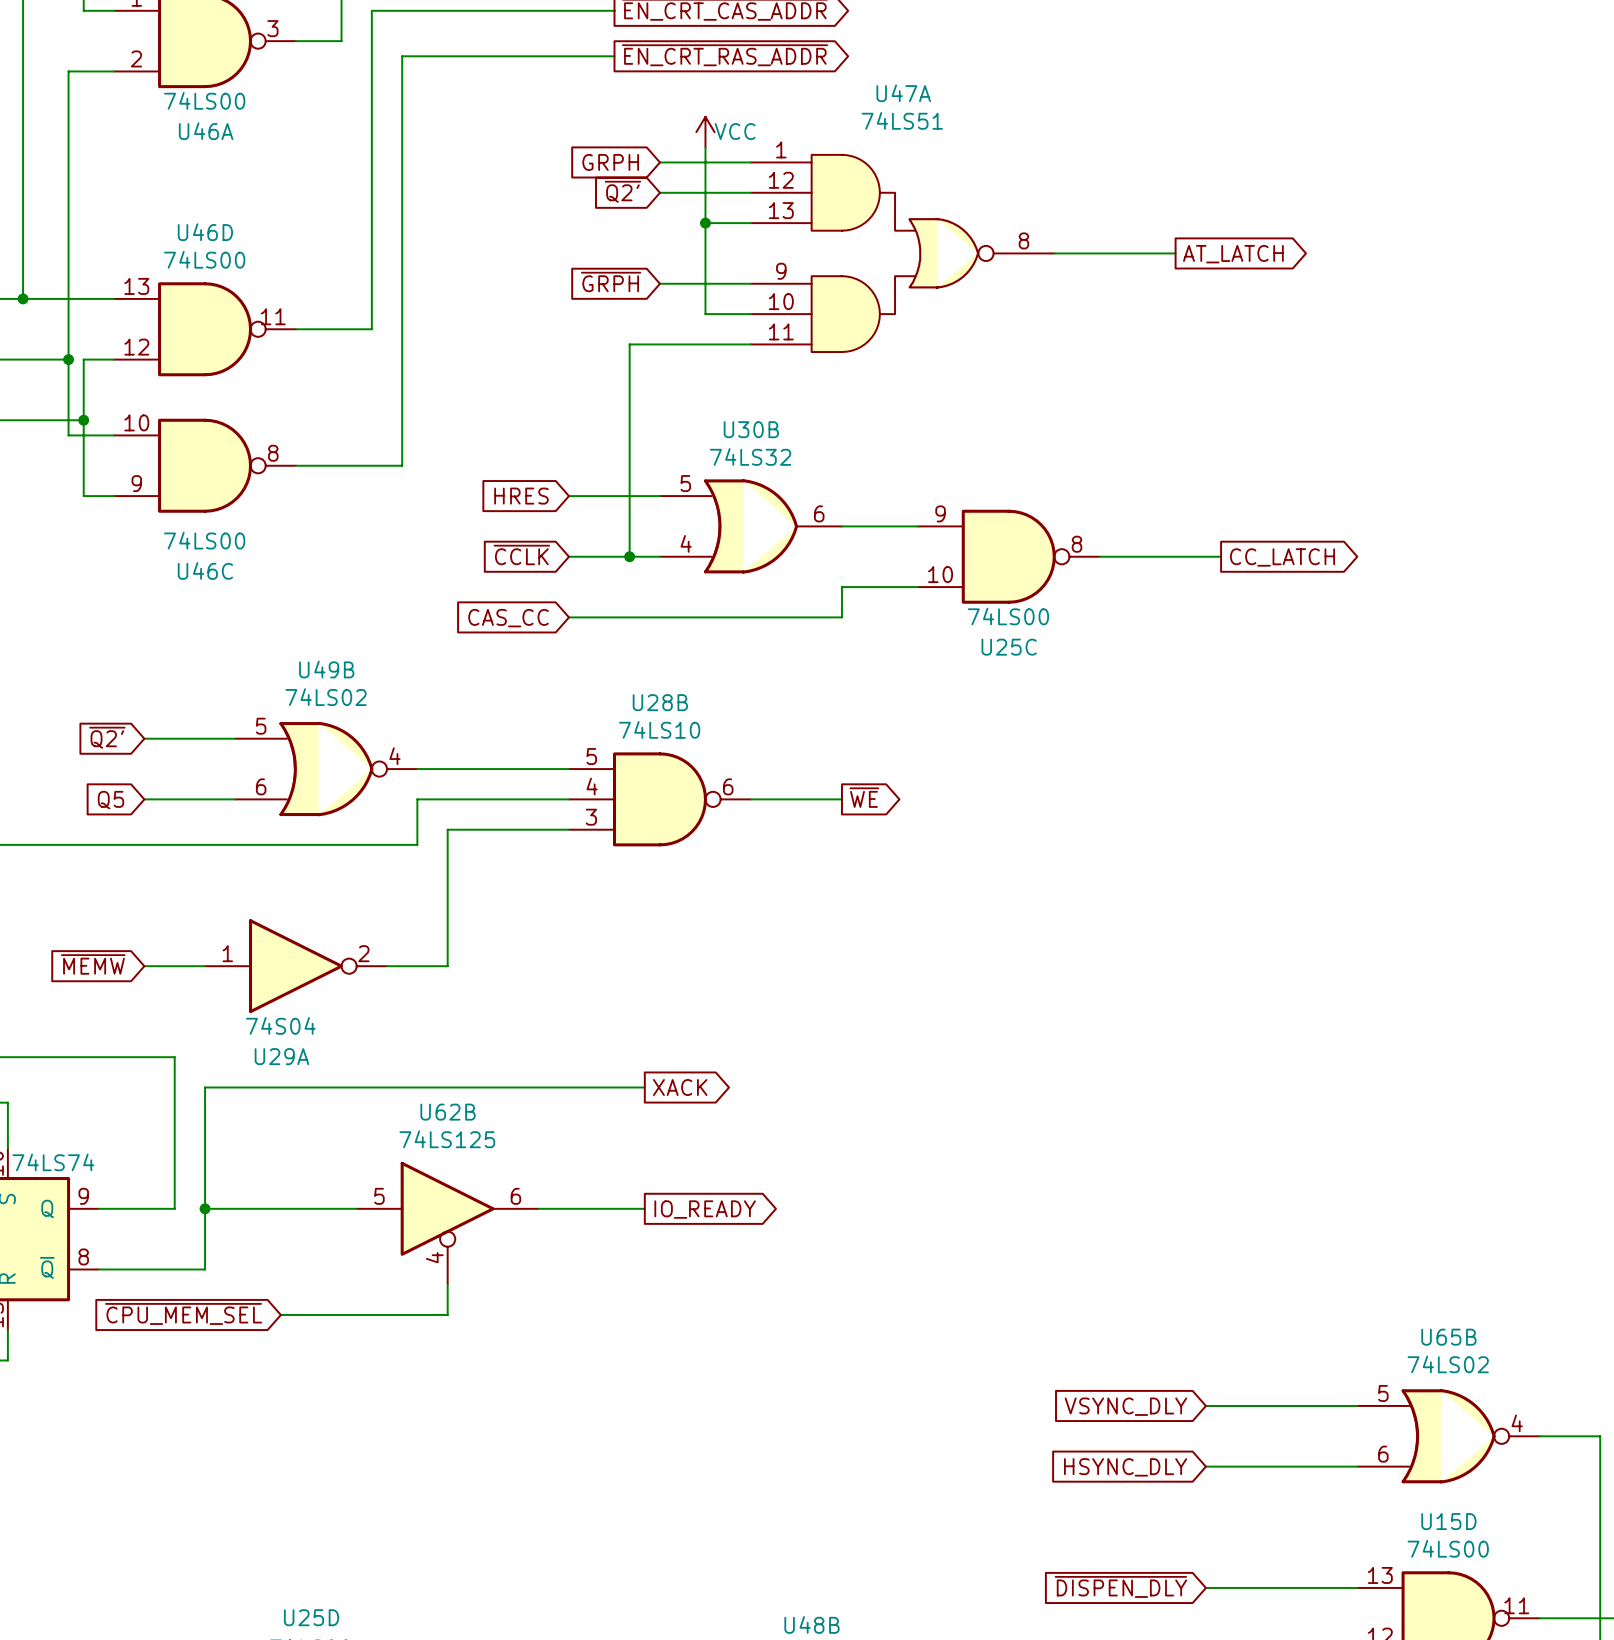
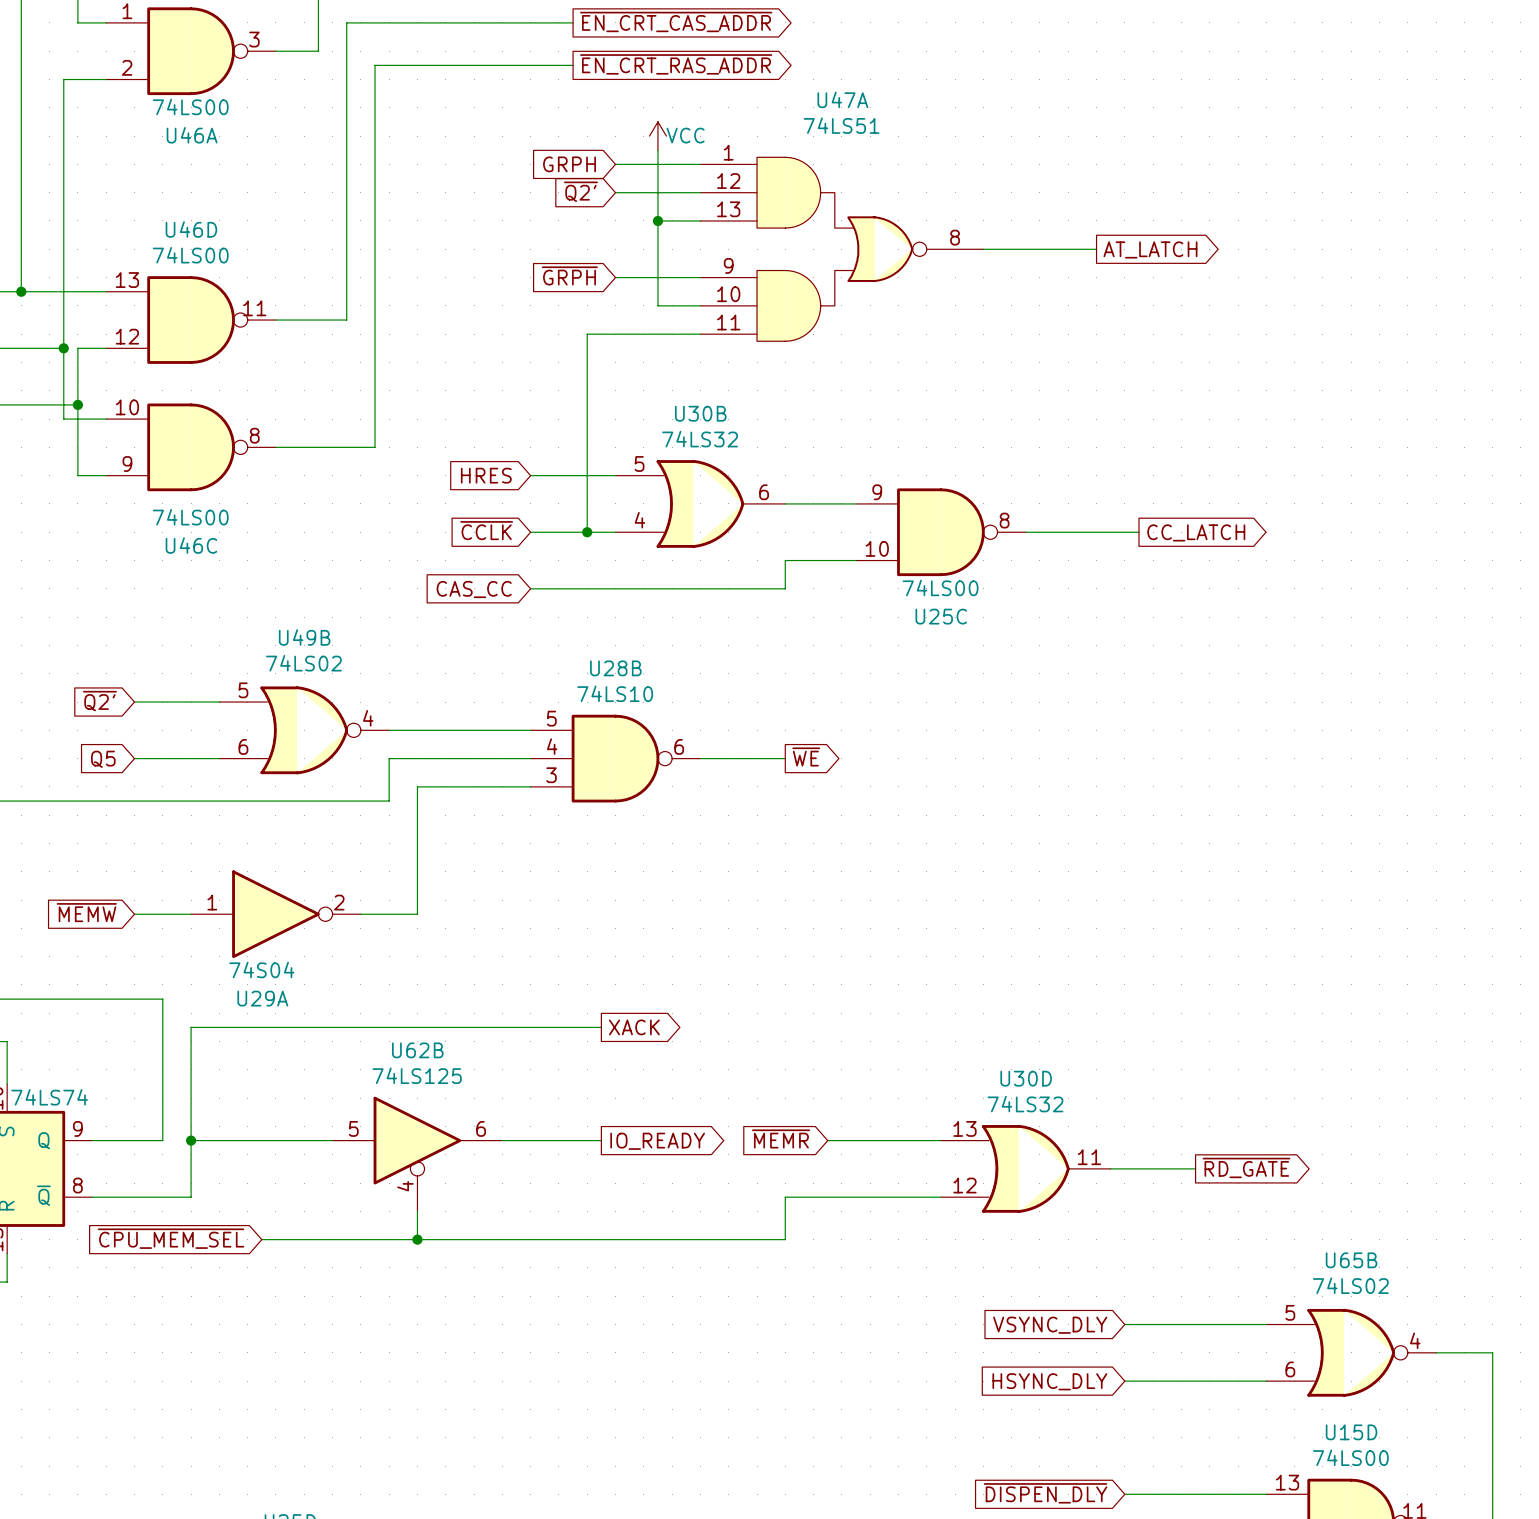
global label: none -> ~{MEMR} (781, 1138)
wire: none -> (827, 1140) (940, 1140)
global label: none -> ~{RD_GATE} (1246, 1167)
U30D: none -> 74LS32 (1025, 1168)
wire: none -> (1110, 1168) (1195, 1168)
wire: none -> (940, 1197) (785, 1197) (785, 1239) (417, 1239)
junction: none -> (417, 1239)

